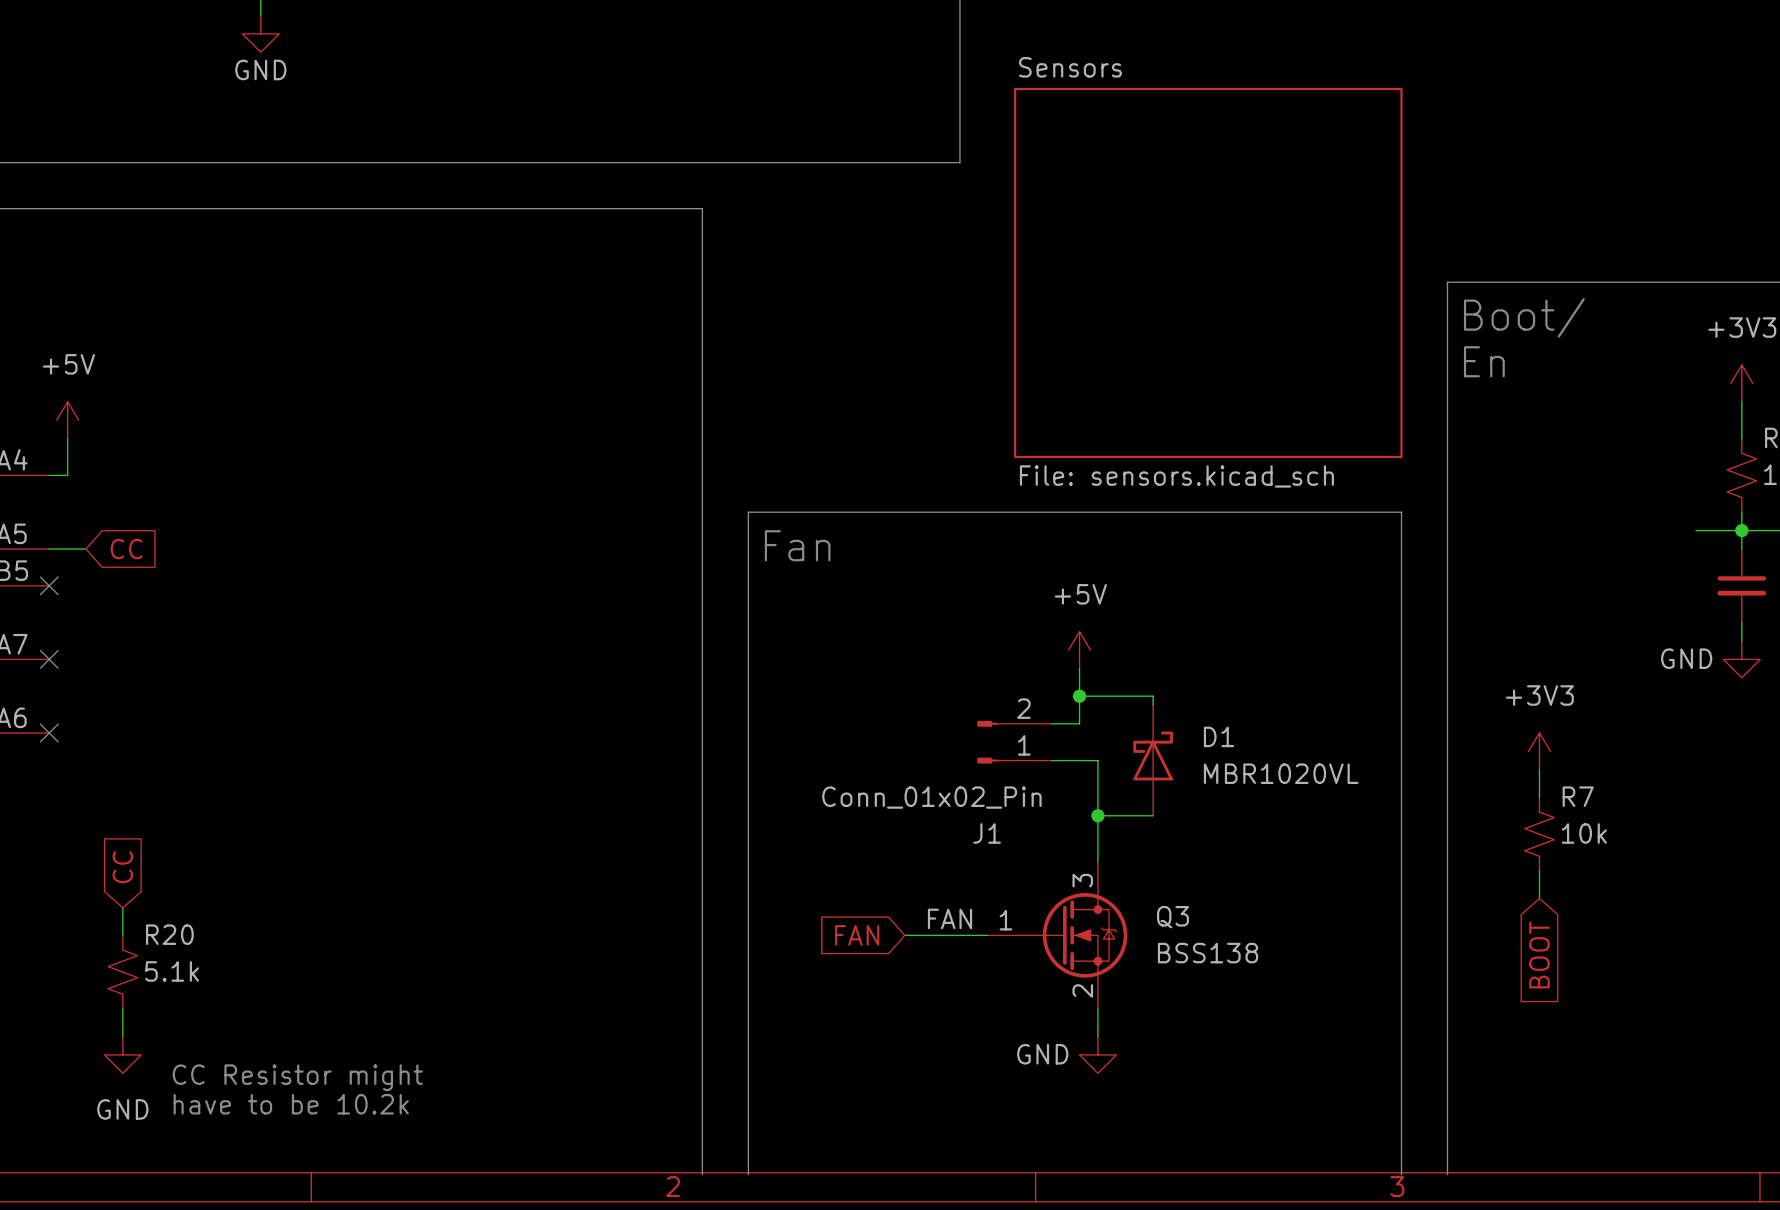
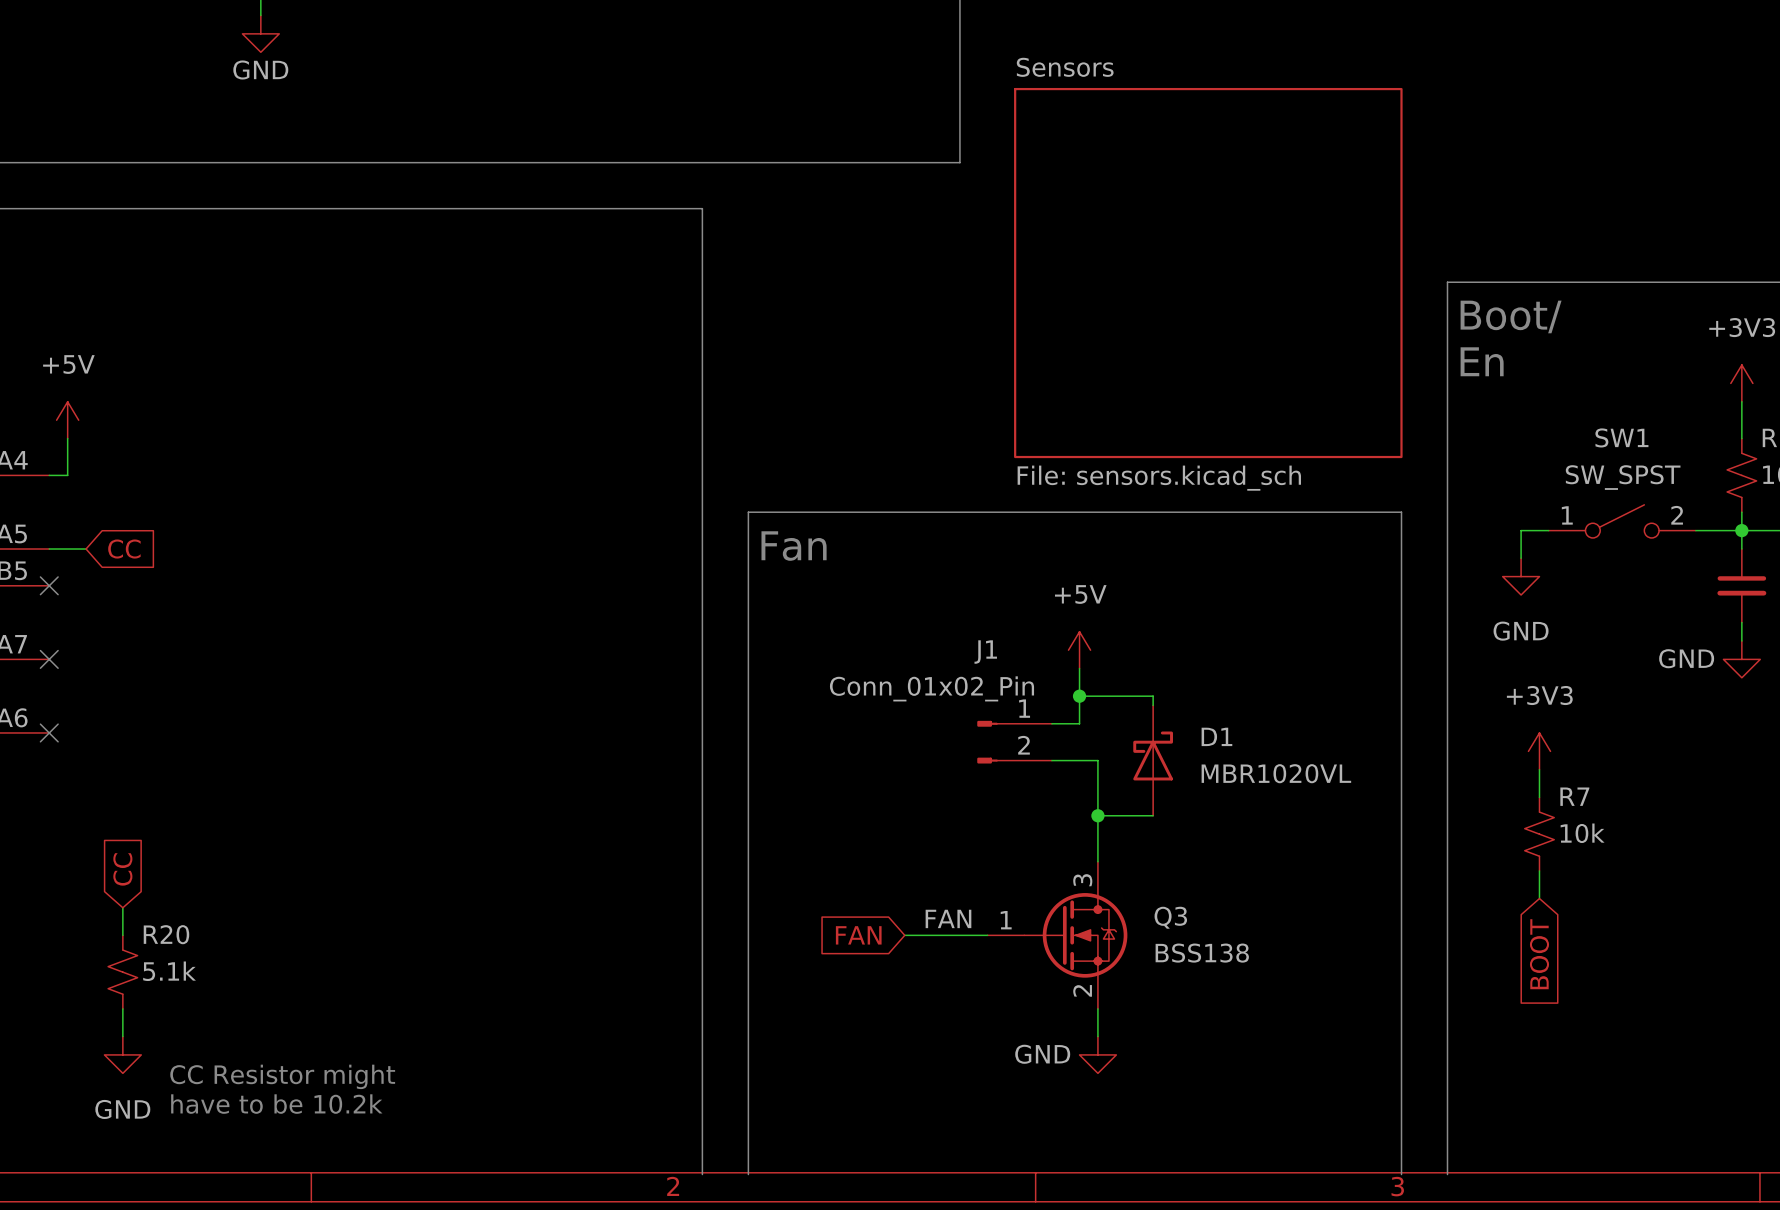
SW1: none -> SW_SPST (1622, 521)
wire: none -> (1548, 530) (1521, 530) (1521, 558)
power symbol: none -> GND (1521, 576)
J1 flip: as is (987, 742) -> up-down (987, 742)

